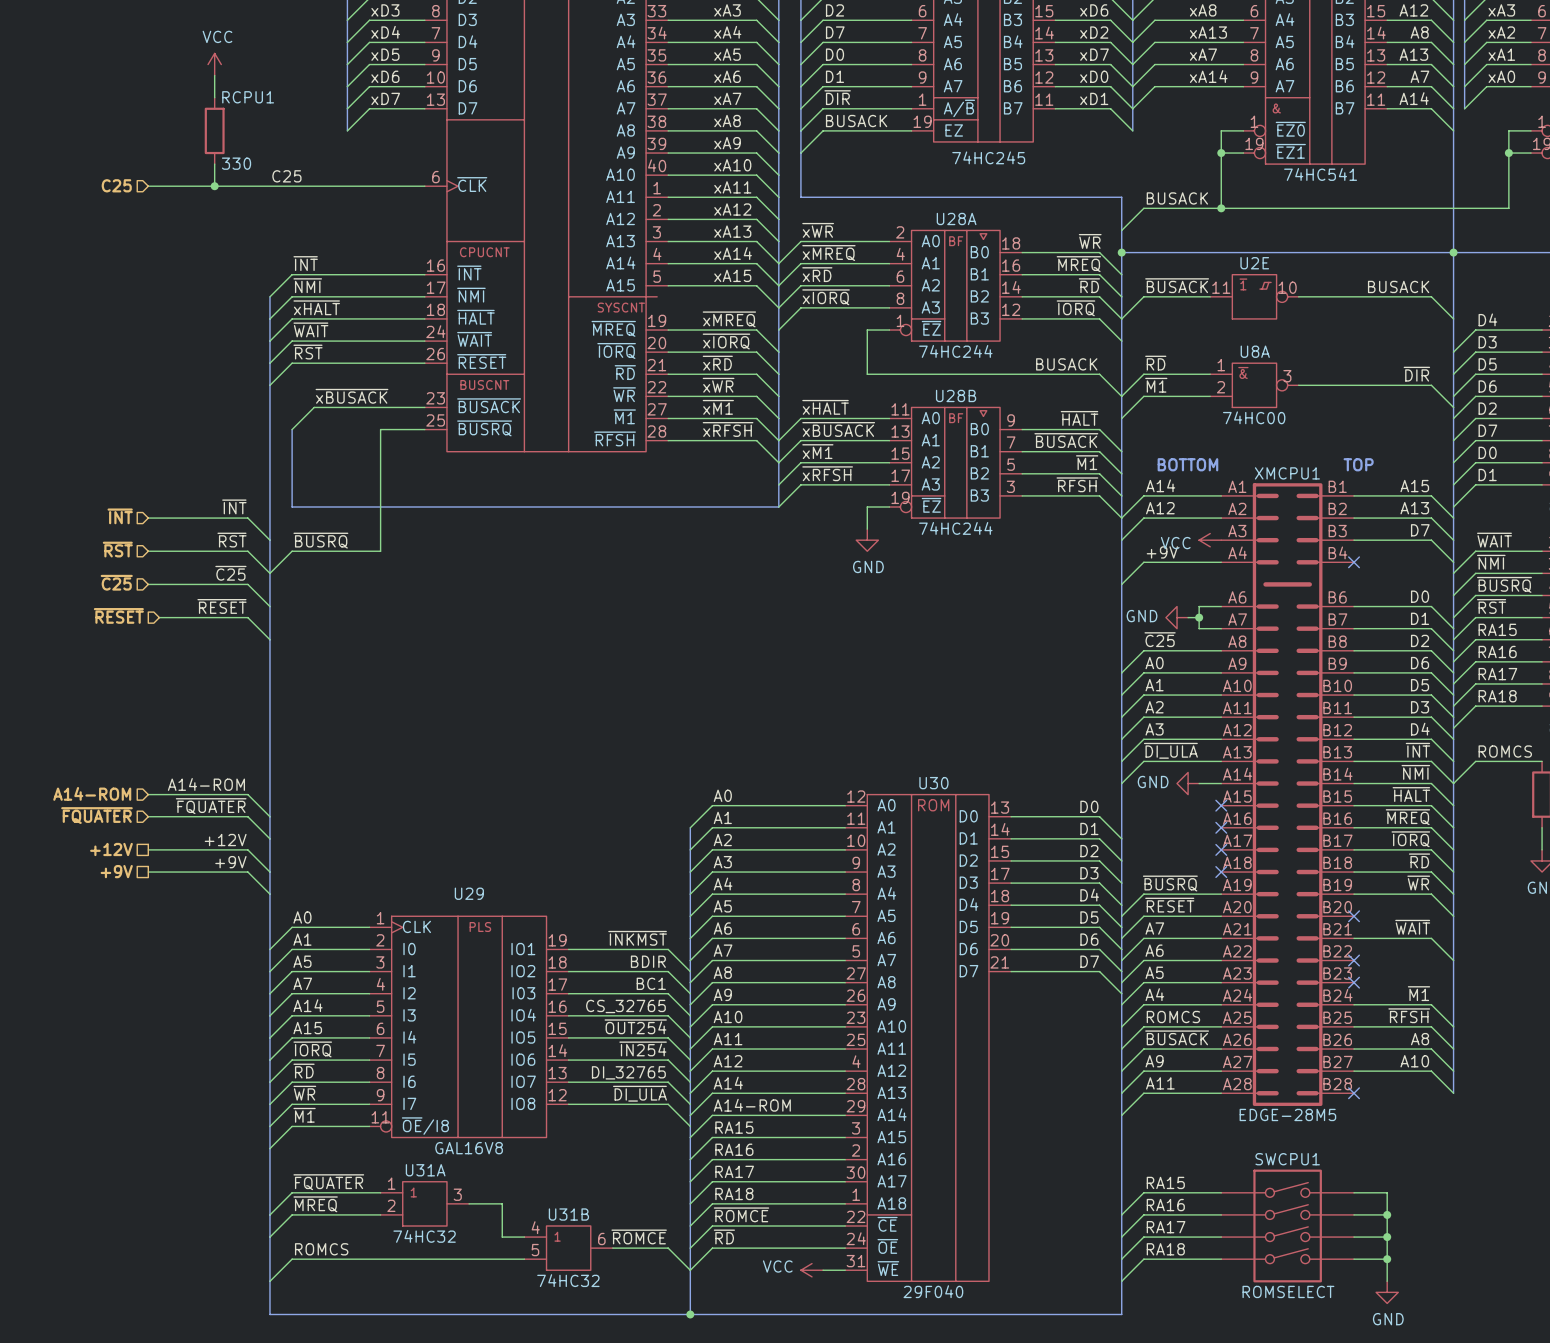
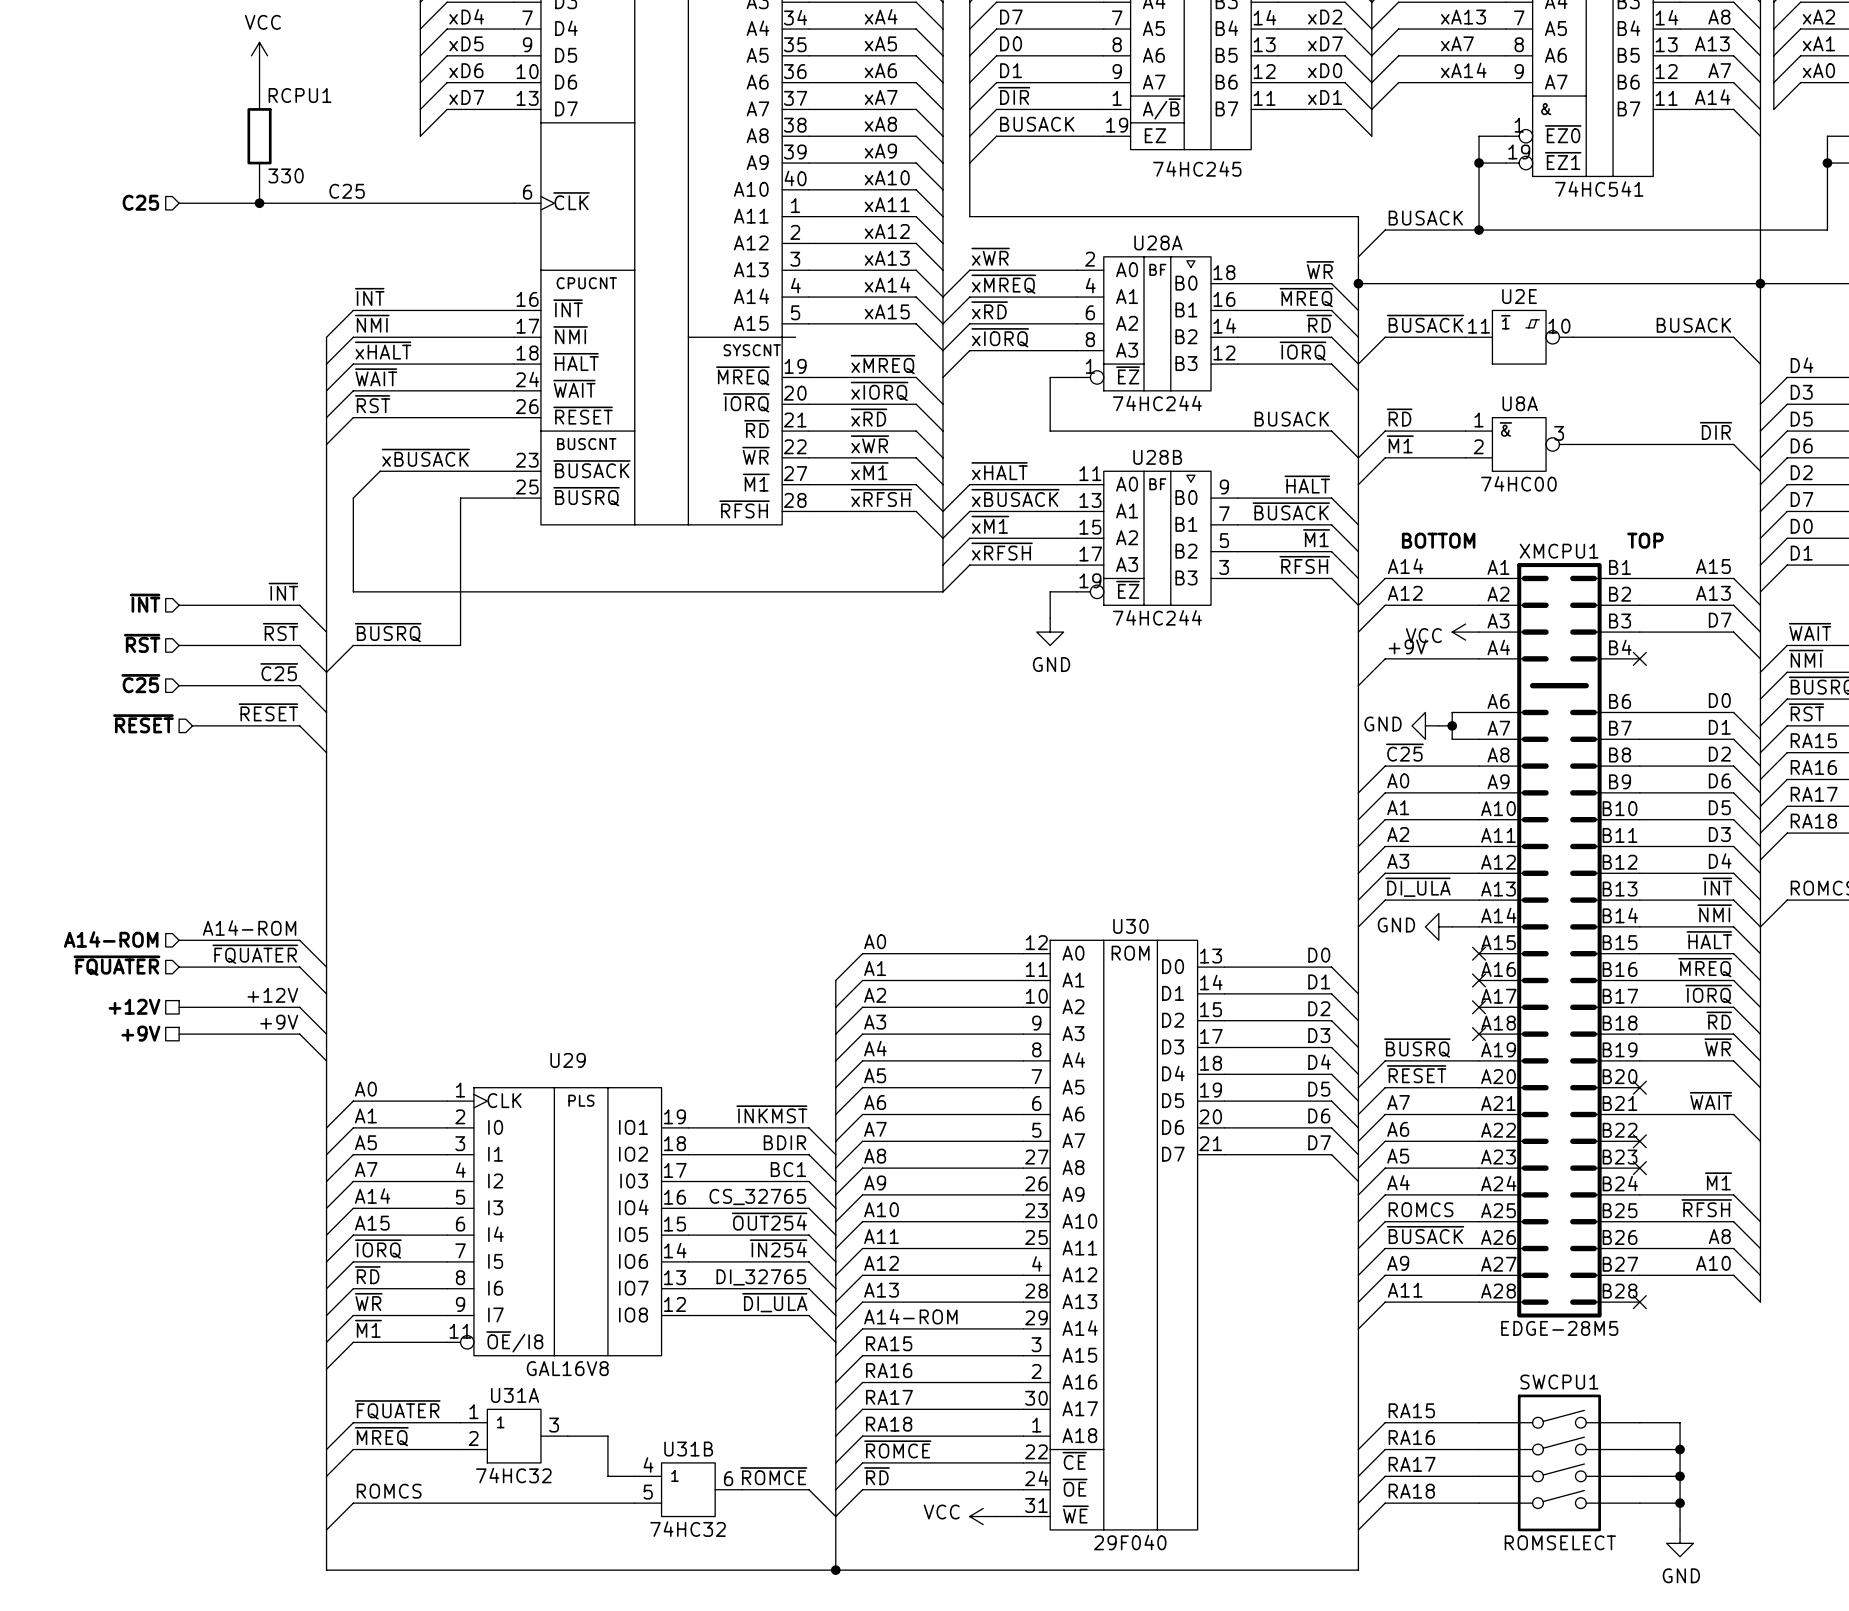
label: A14 (728, 1083) -> A13 (881, 1290)

